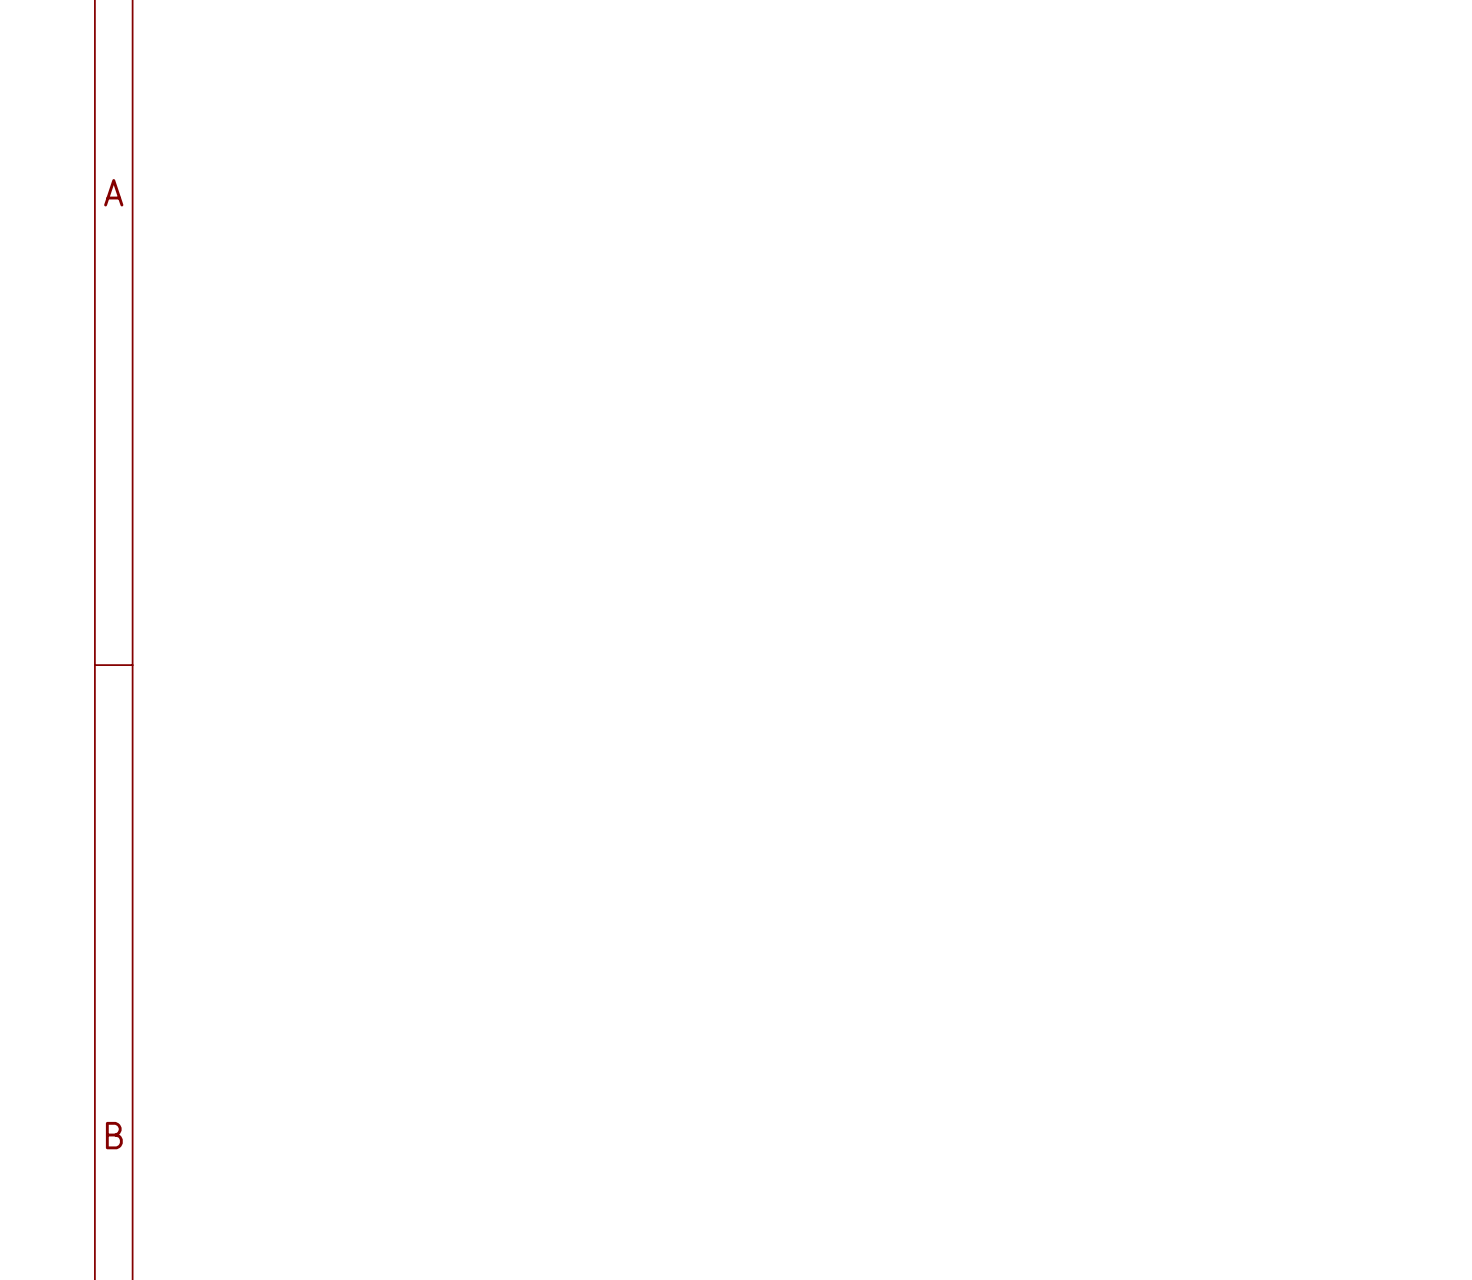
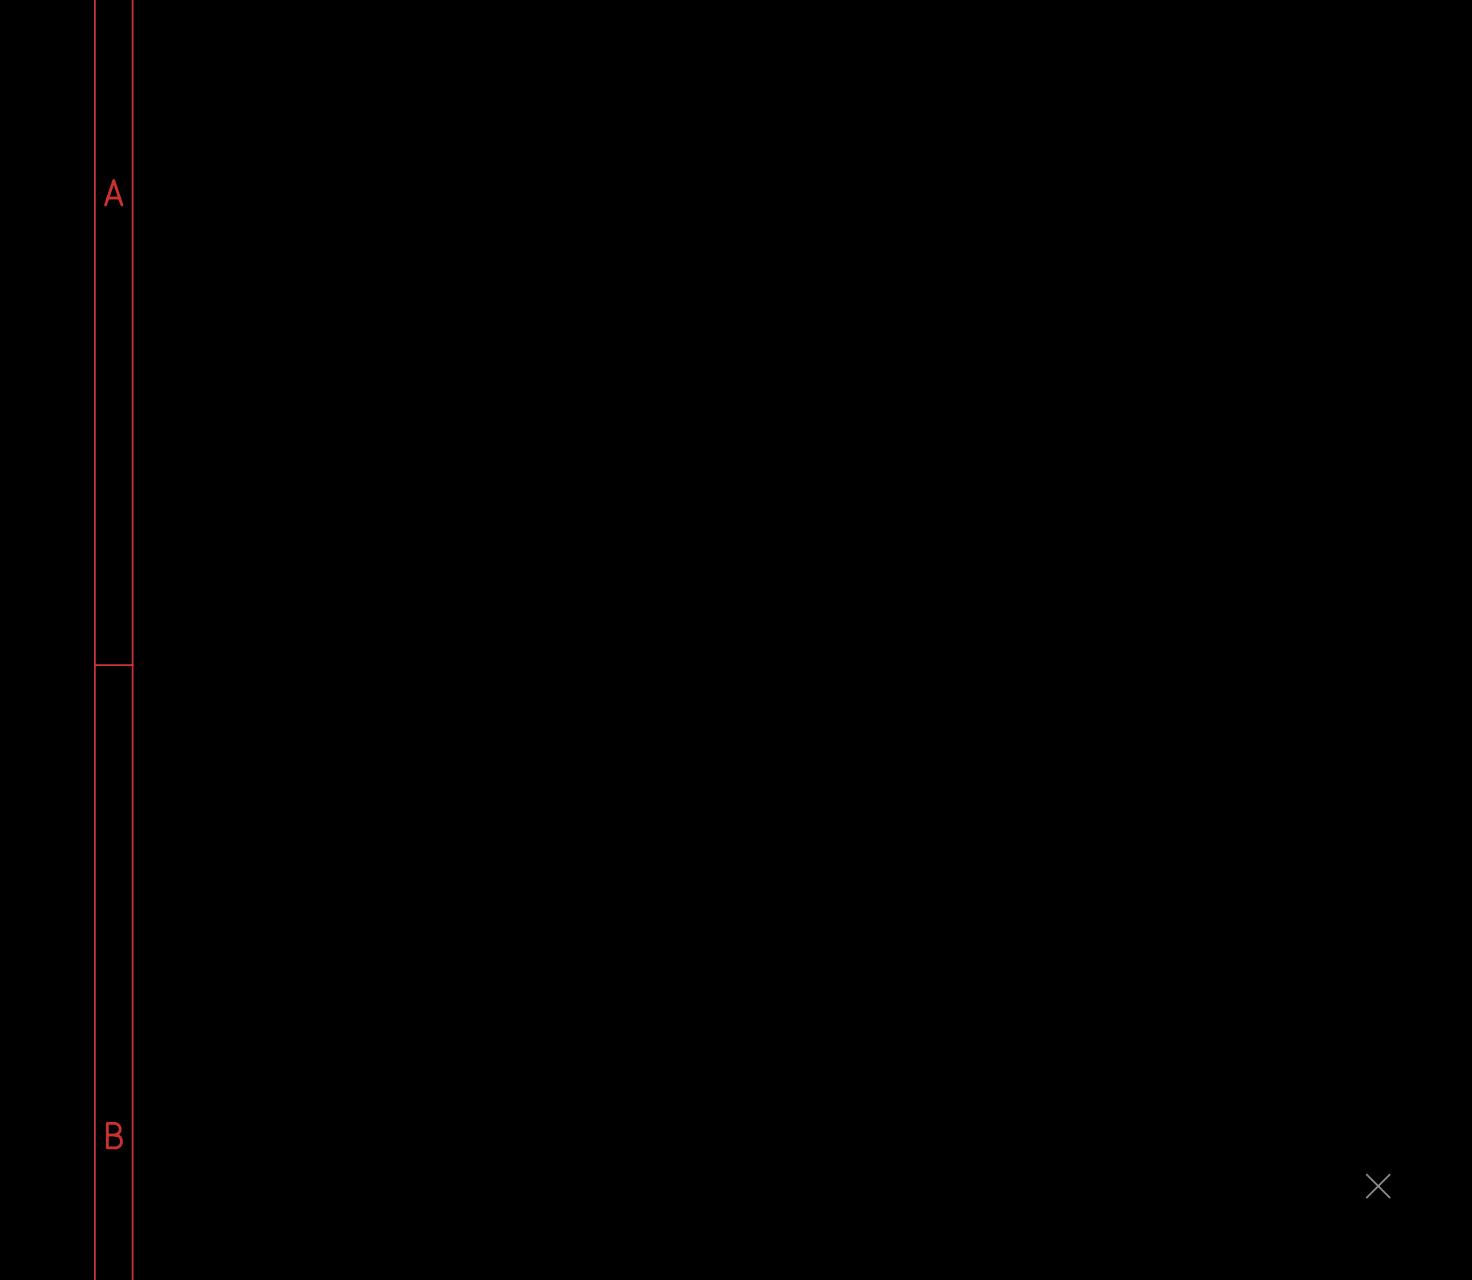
no-connect mark: none -> (1378, 1186)

